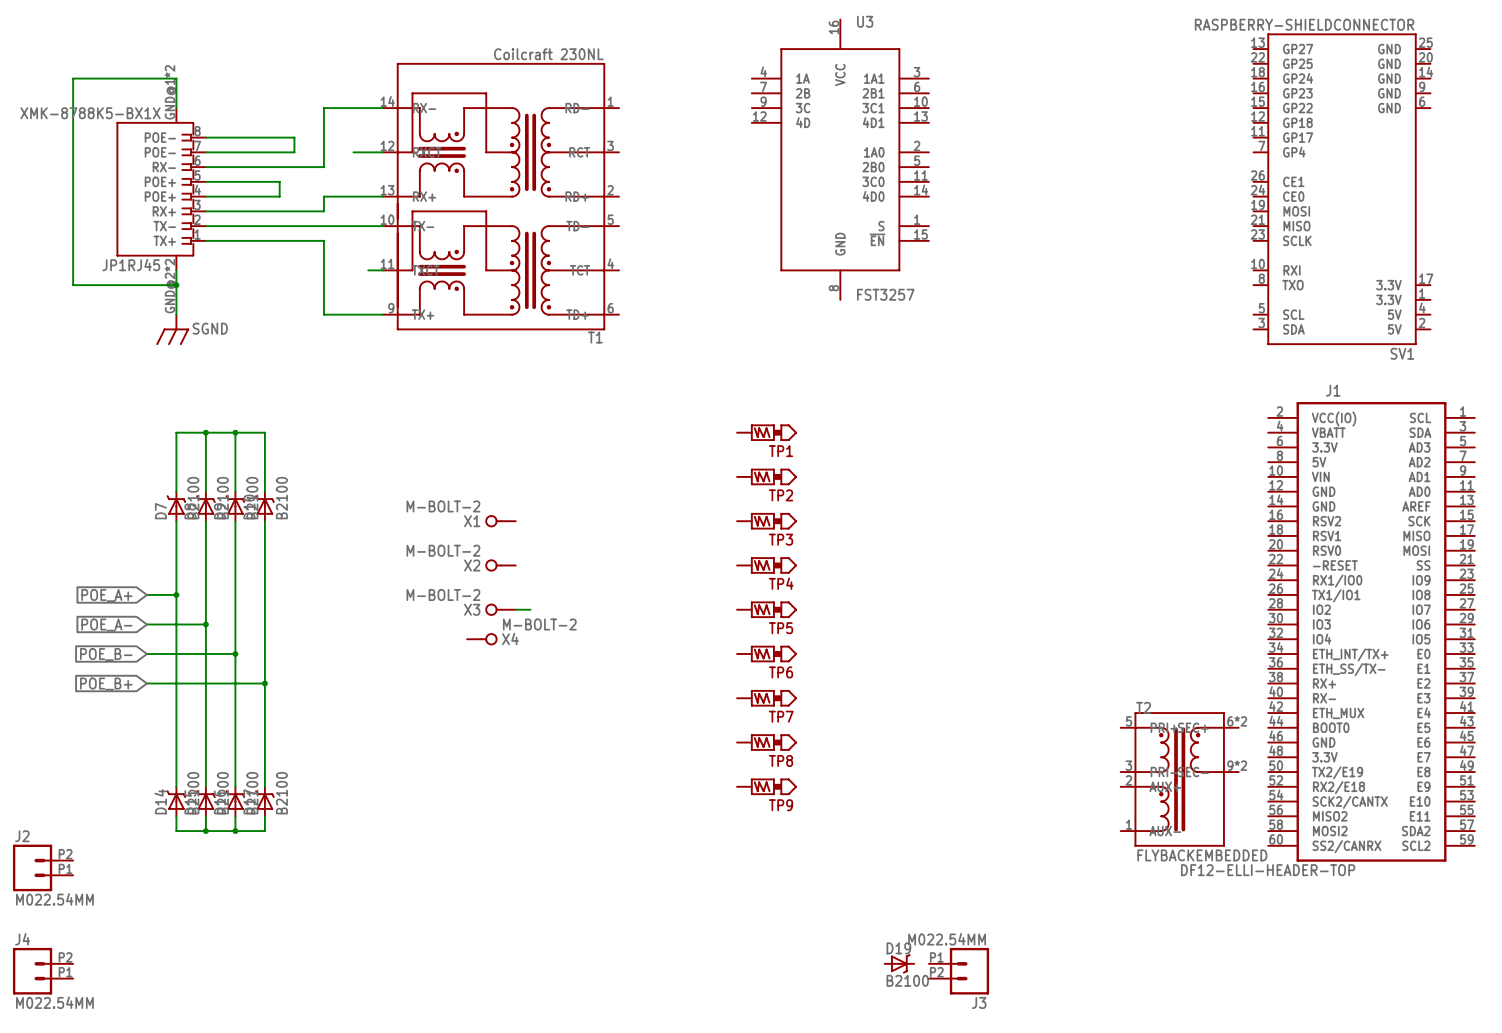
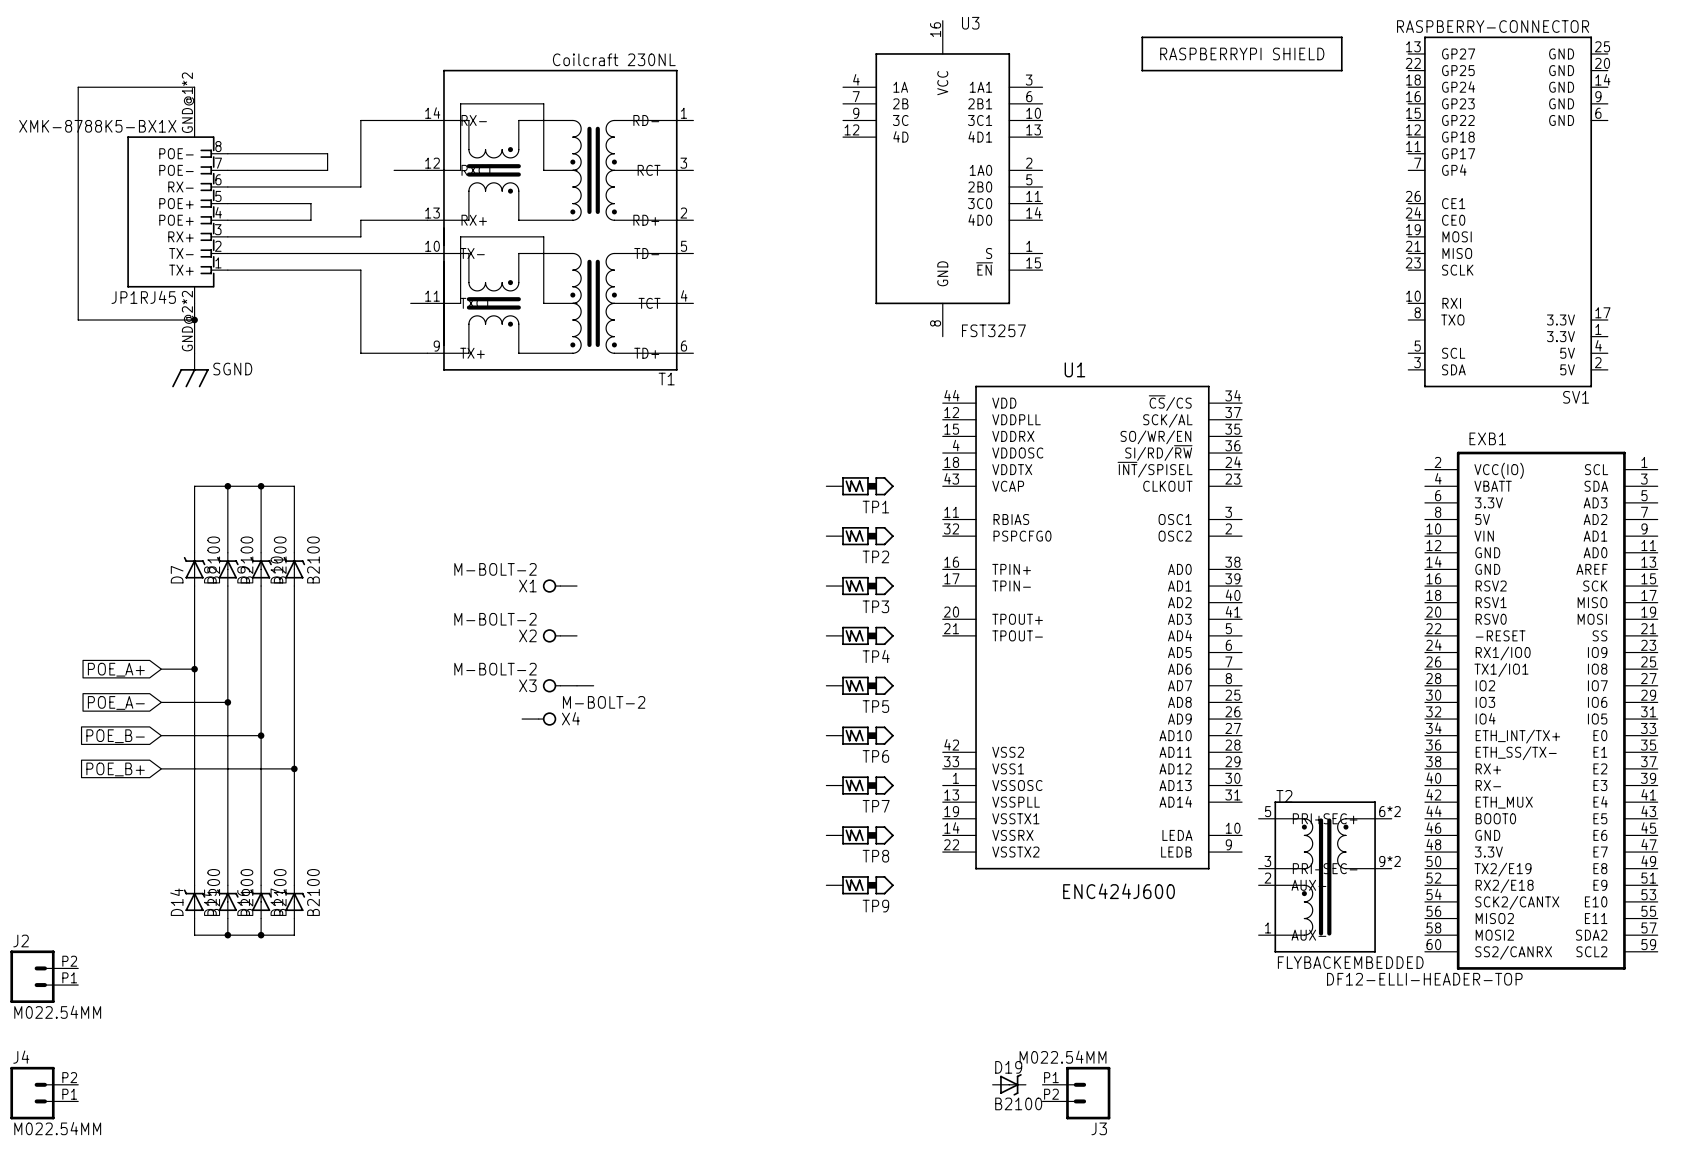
SV1 value: RASPBERRY-SHIELDCONNECTOR (1304, 24) -> RASPBERRY-CONNECTOR (1493, 26)
part: none -> (1242, 53)
J1 name: J1 (1333, 390) -> EXB1 (1487, 438)
U1: none -> ENC424J600 (1092, 627)

